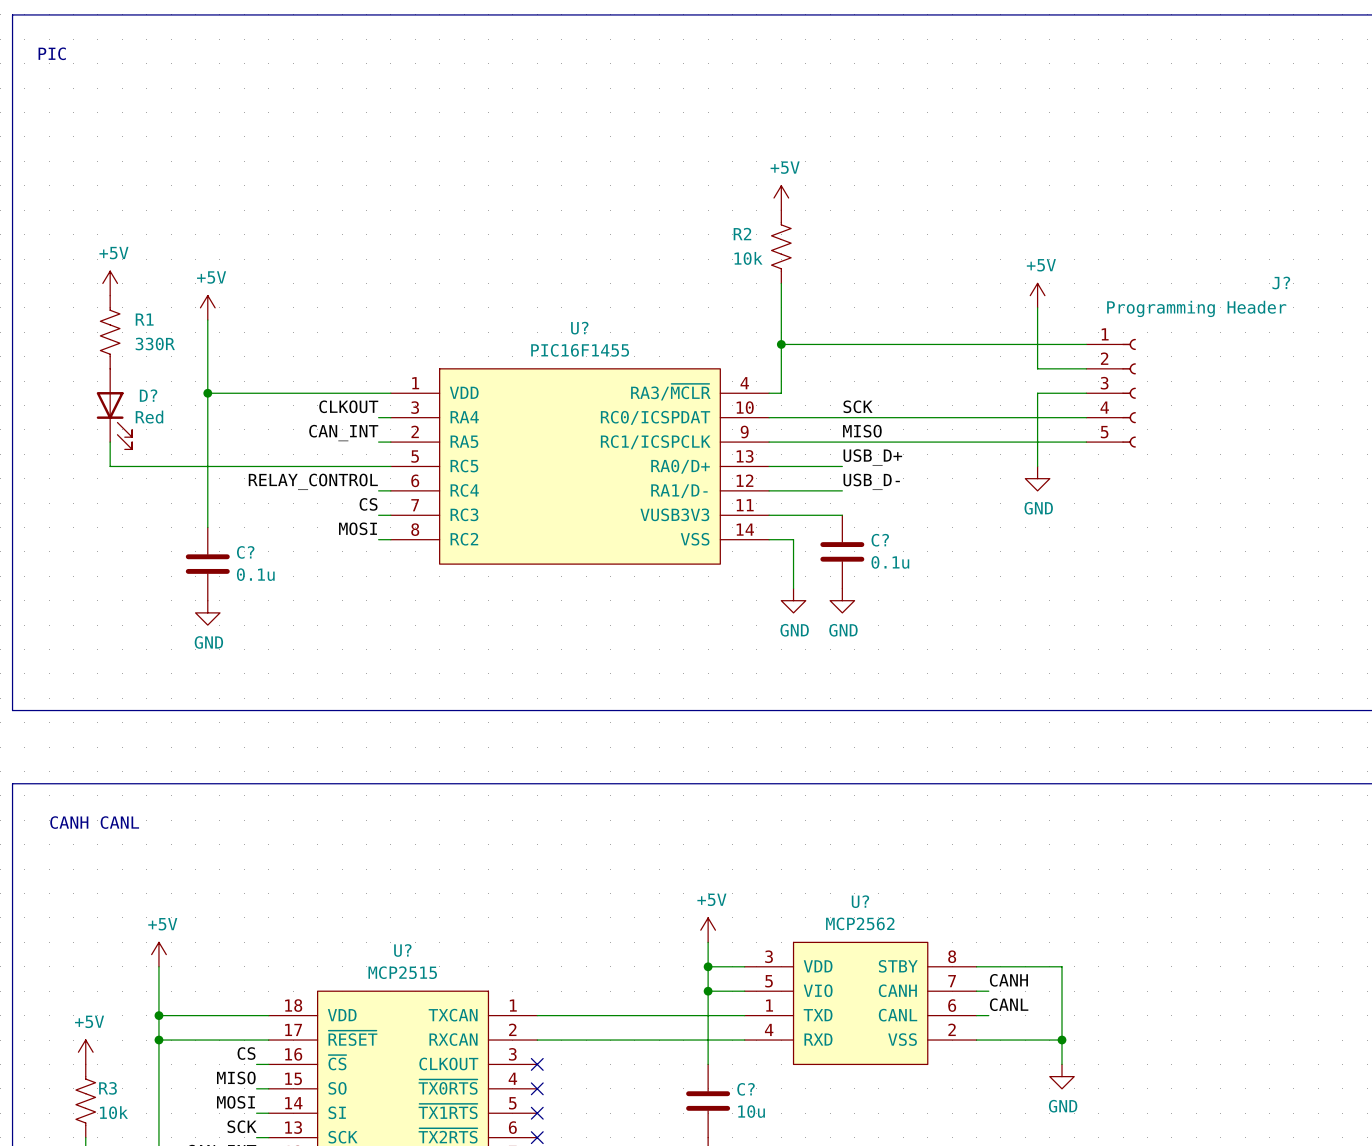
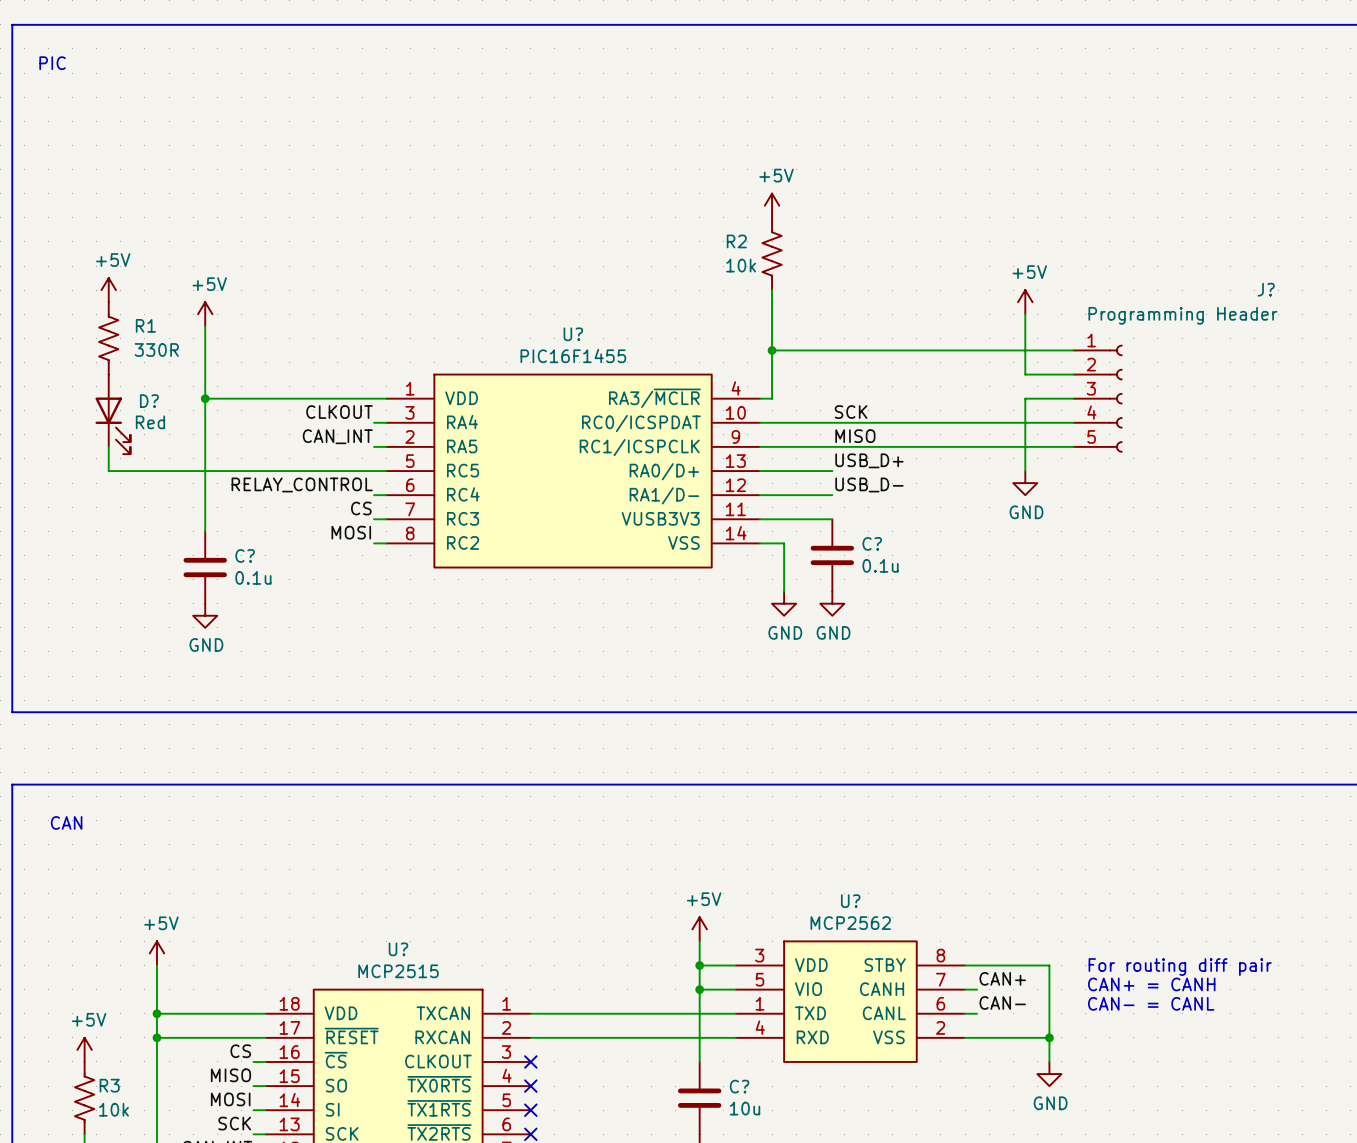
text: CANH CANL (94, 822) -> CAN (66, 822)
text: none -> For routing diff pair (1180, 967)
label: CANH (1008, 980) -> CAN+ (1002, 978)
text: none -> CAN+ = CANH (1151, 984)
label: CANL (1009, 1004) -> CAN- (1002, 1002)
text: none -> CAN- = CANL (1151, 1003)

